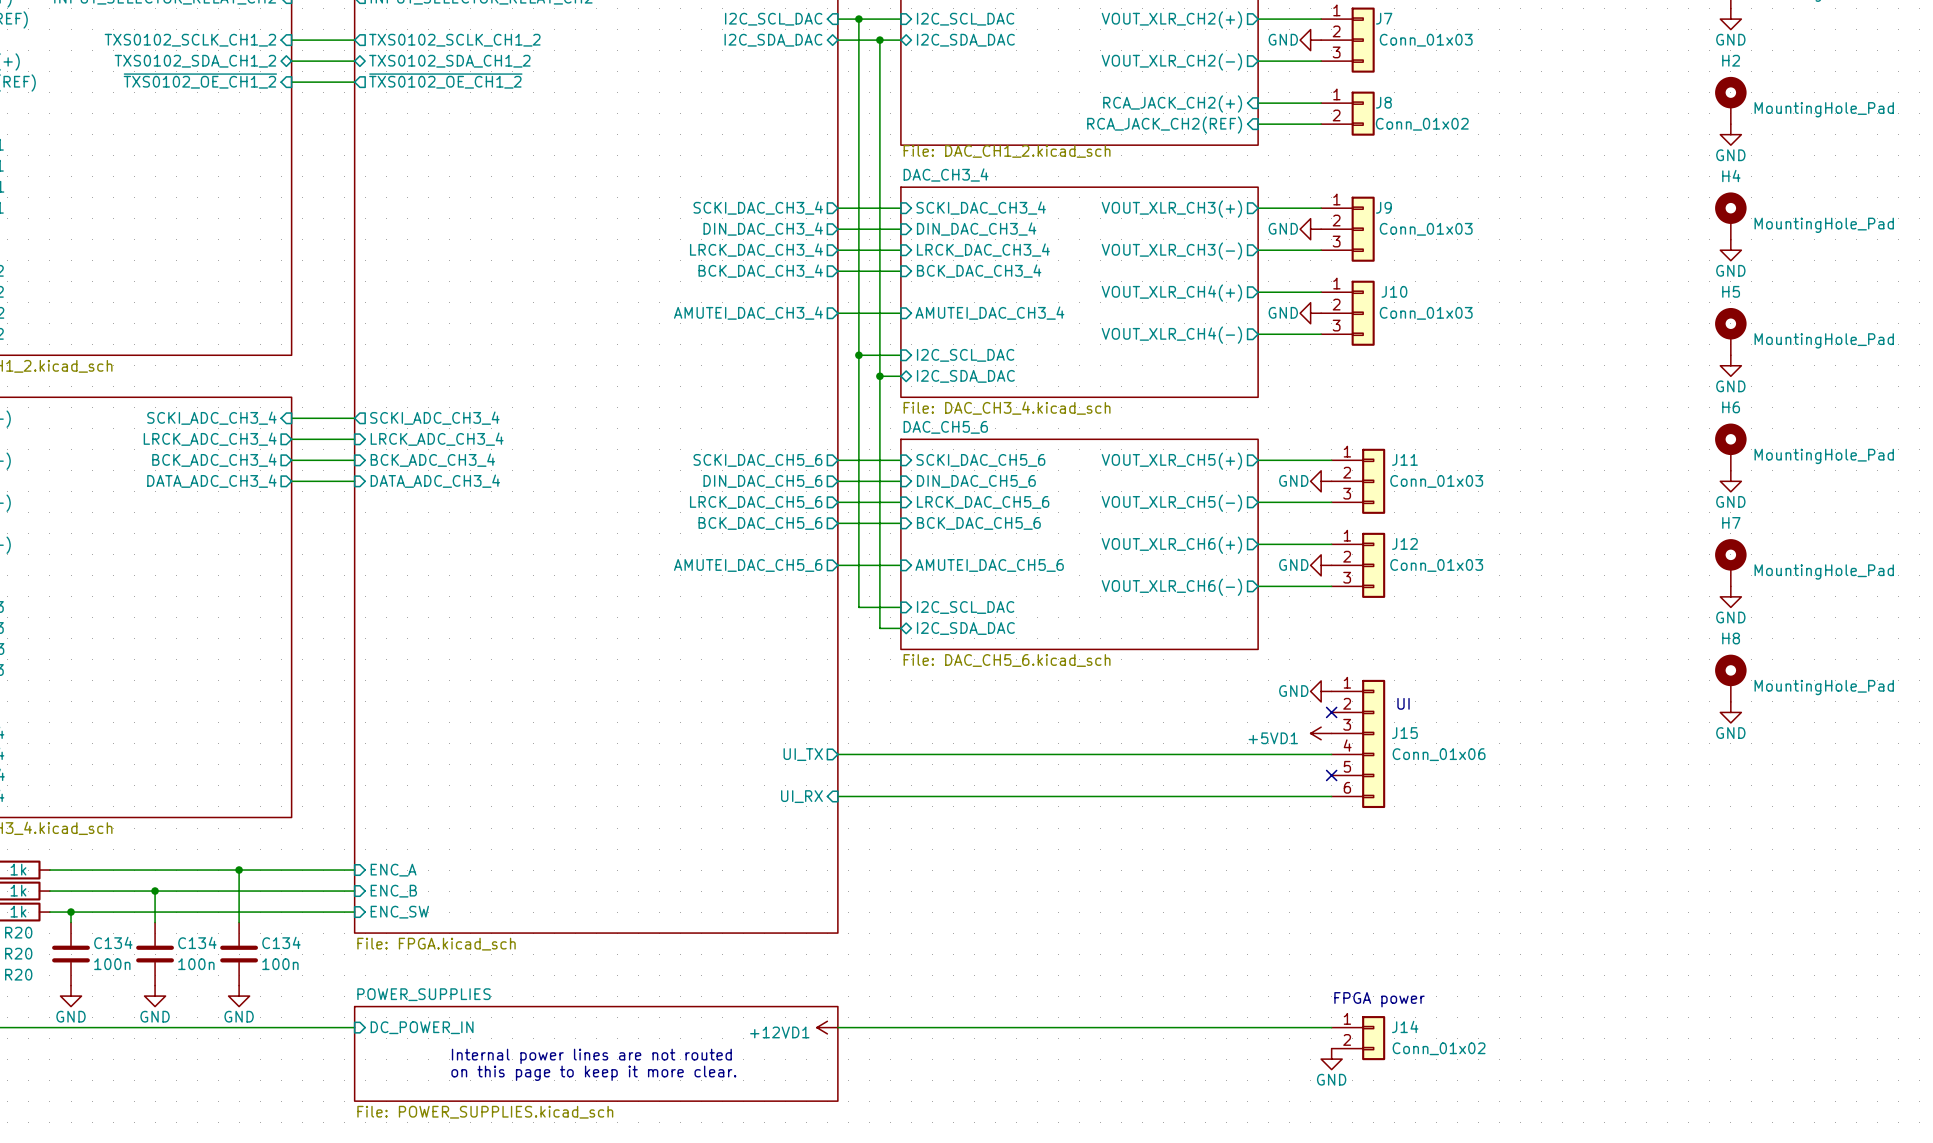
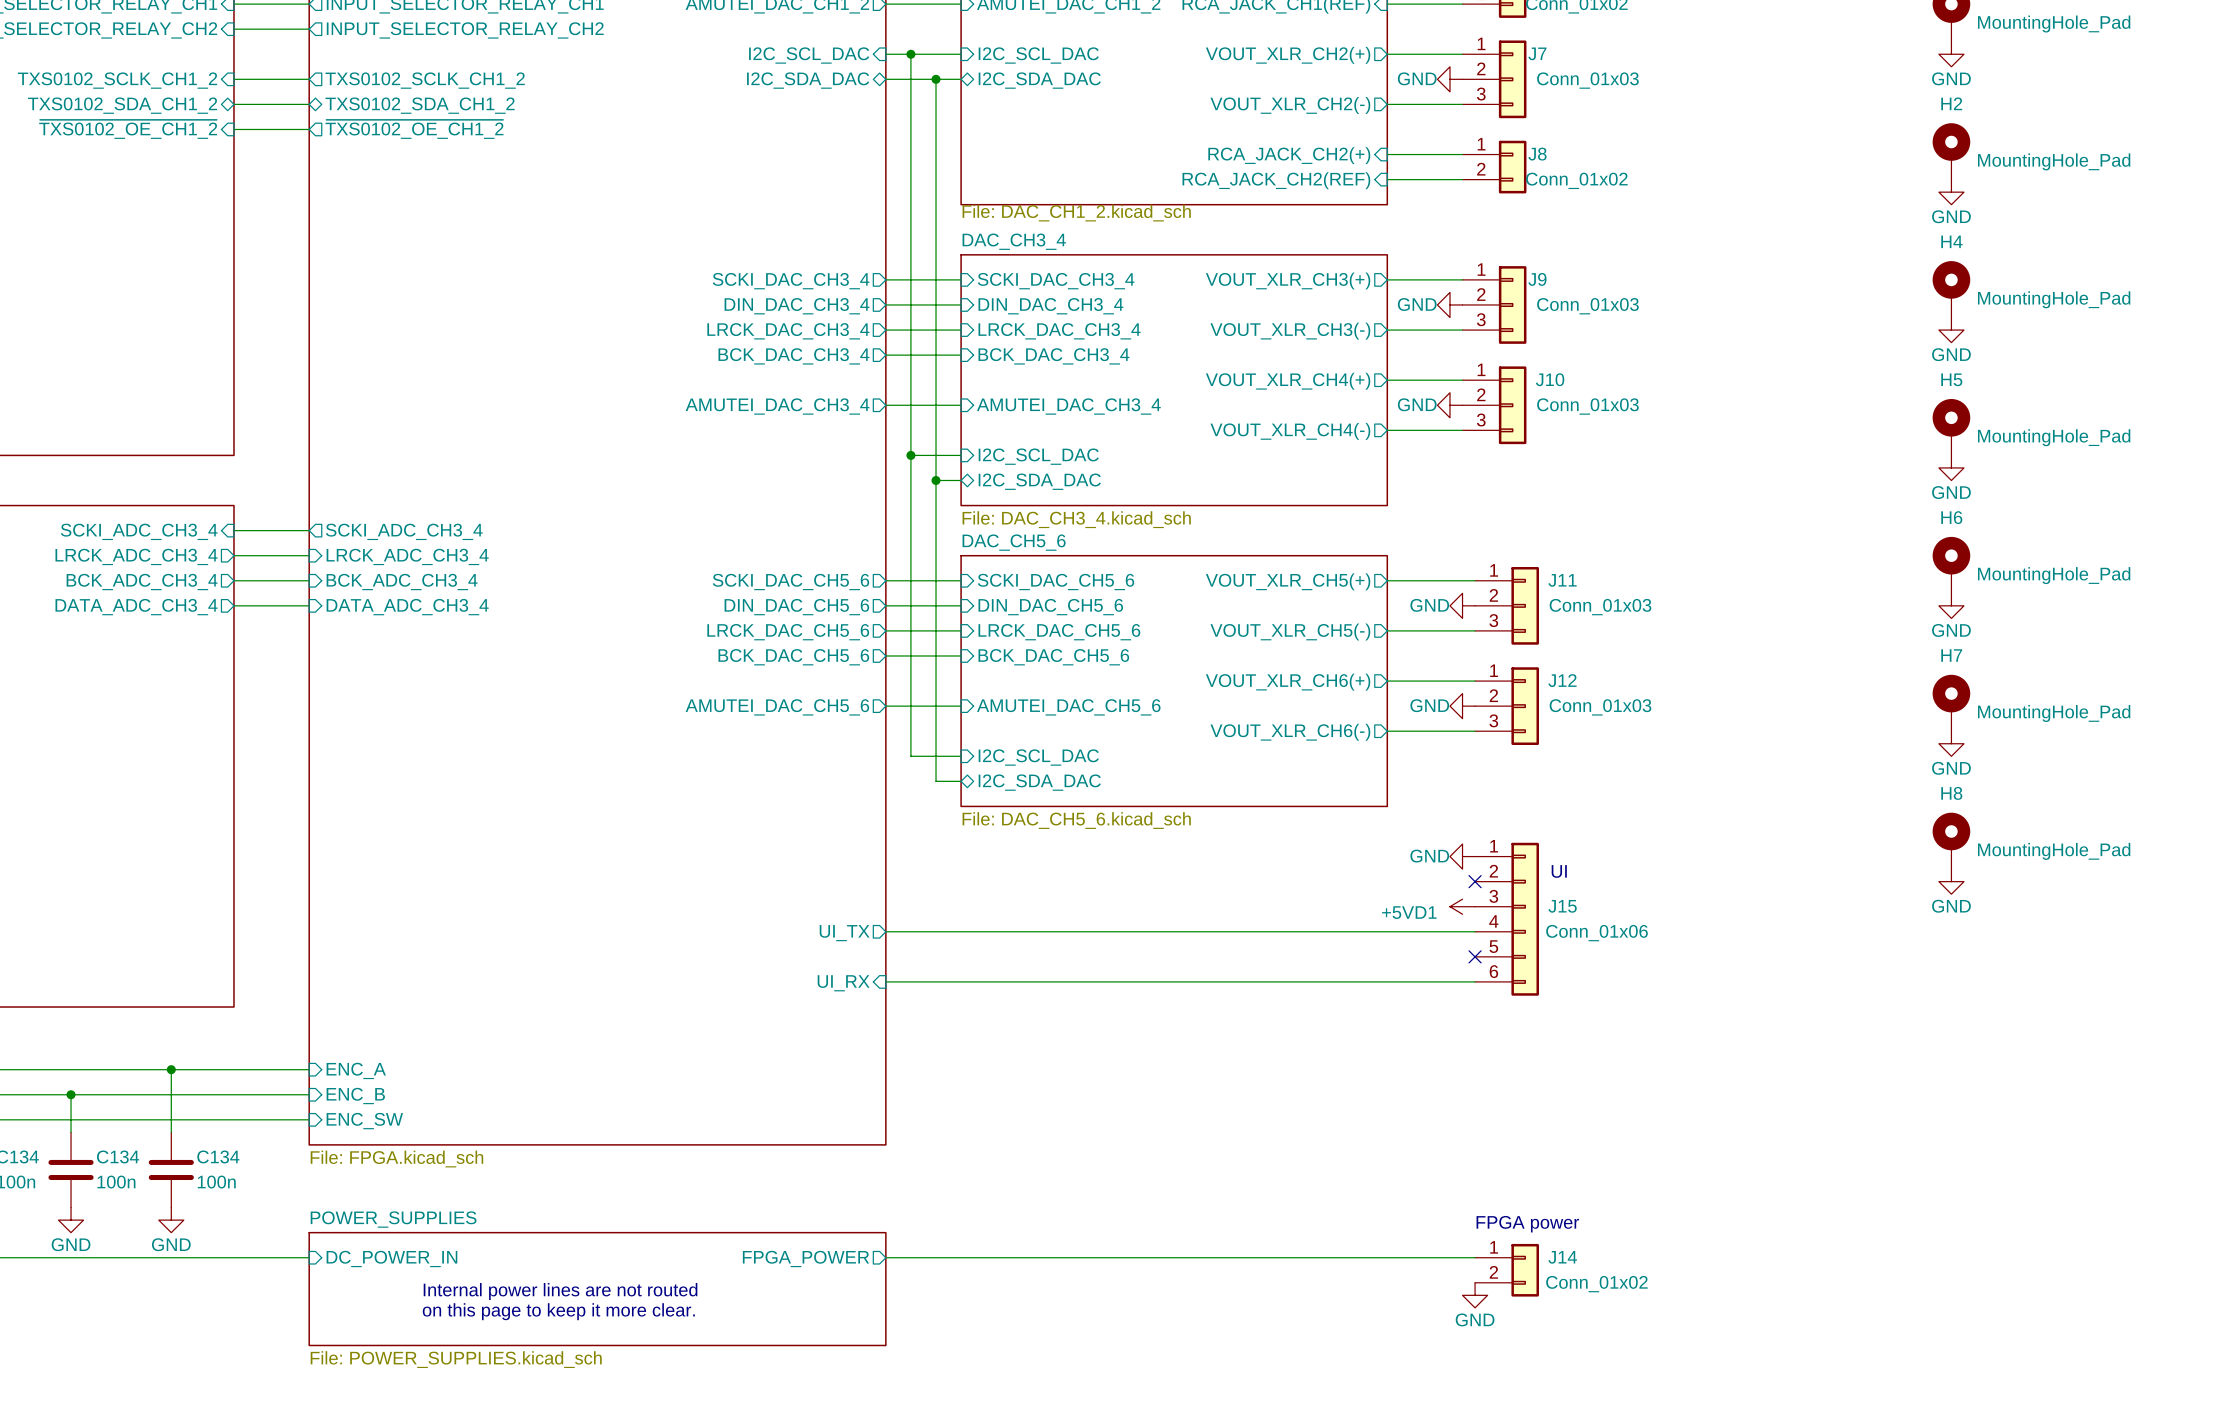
sheet pin: none -> FPGA_POWER (805, 1258)
power symbol: +12VD1 (827, 1027) -> none

